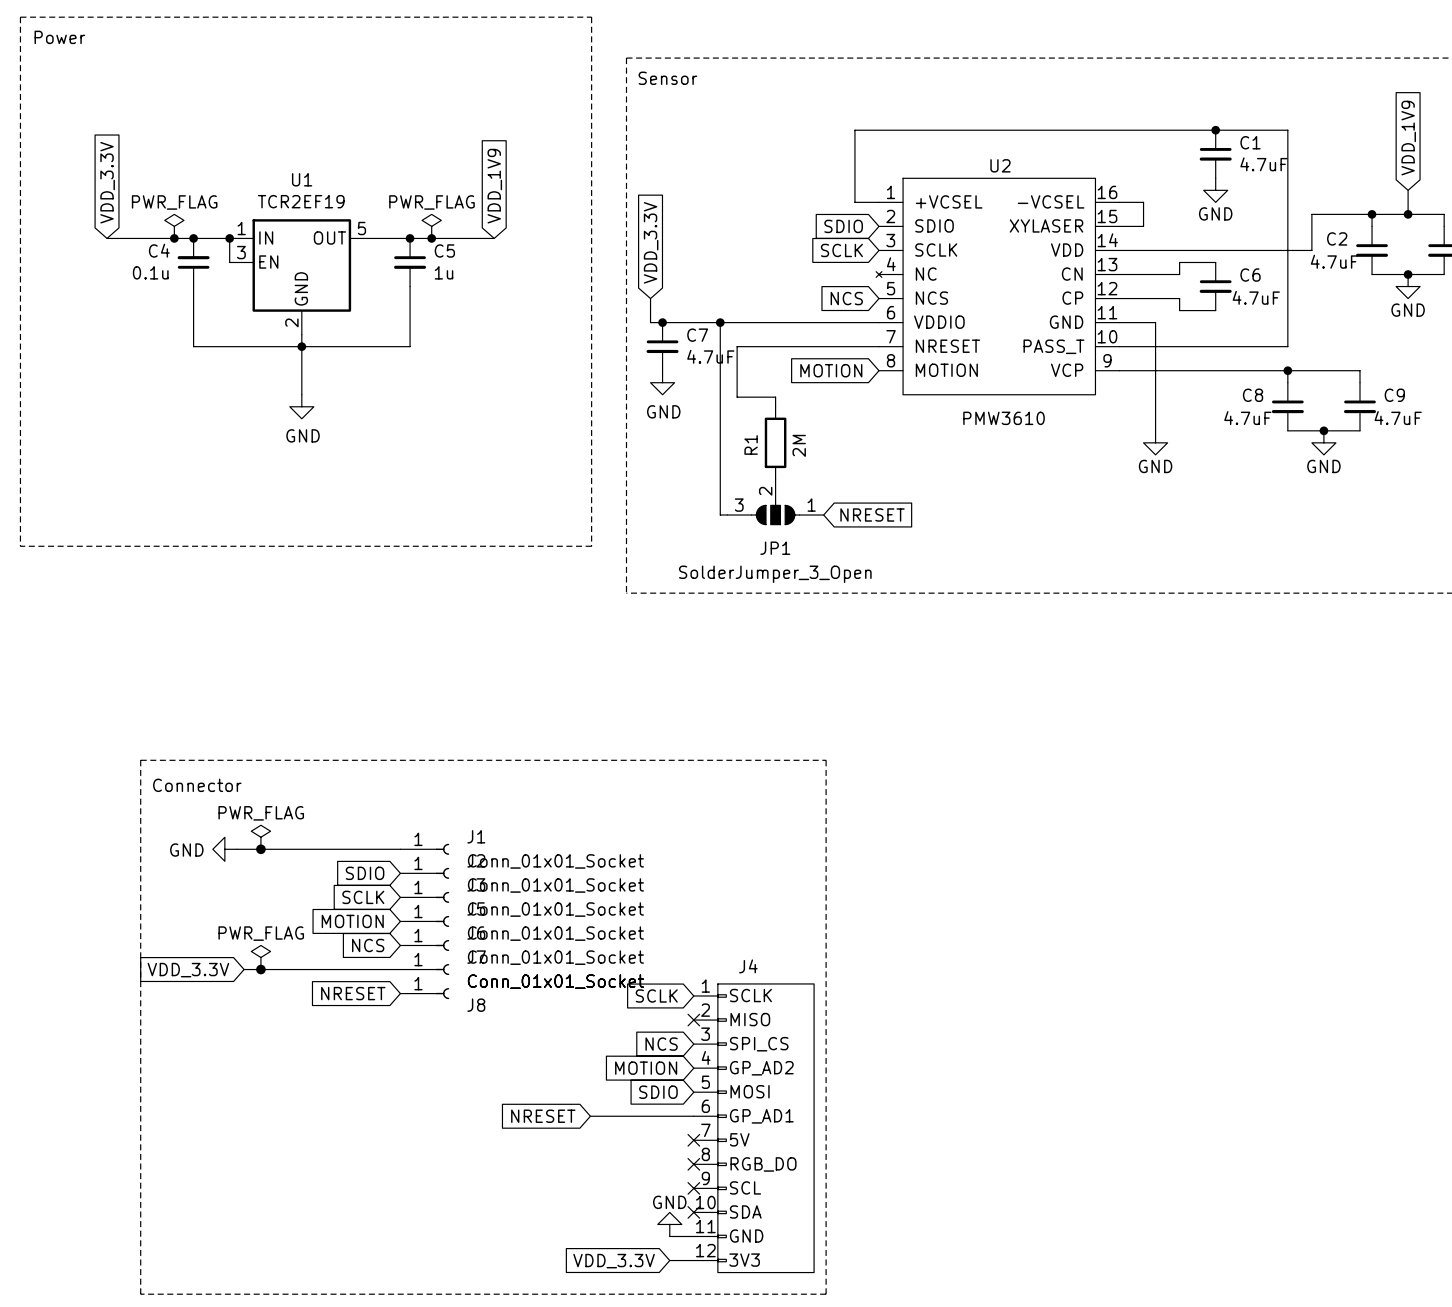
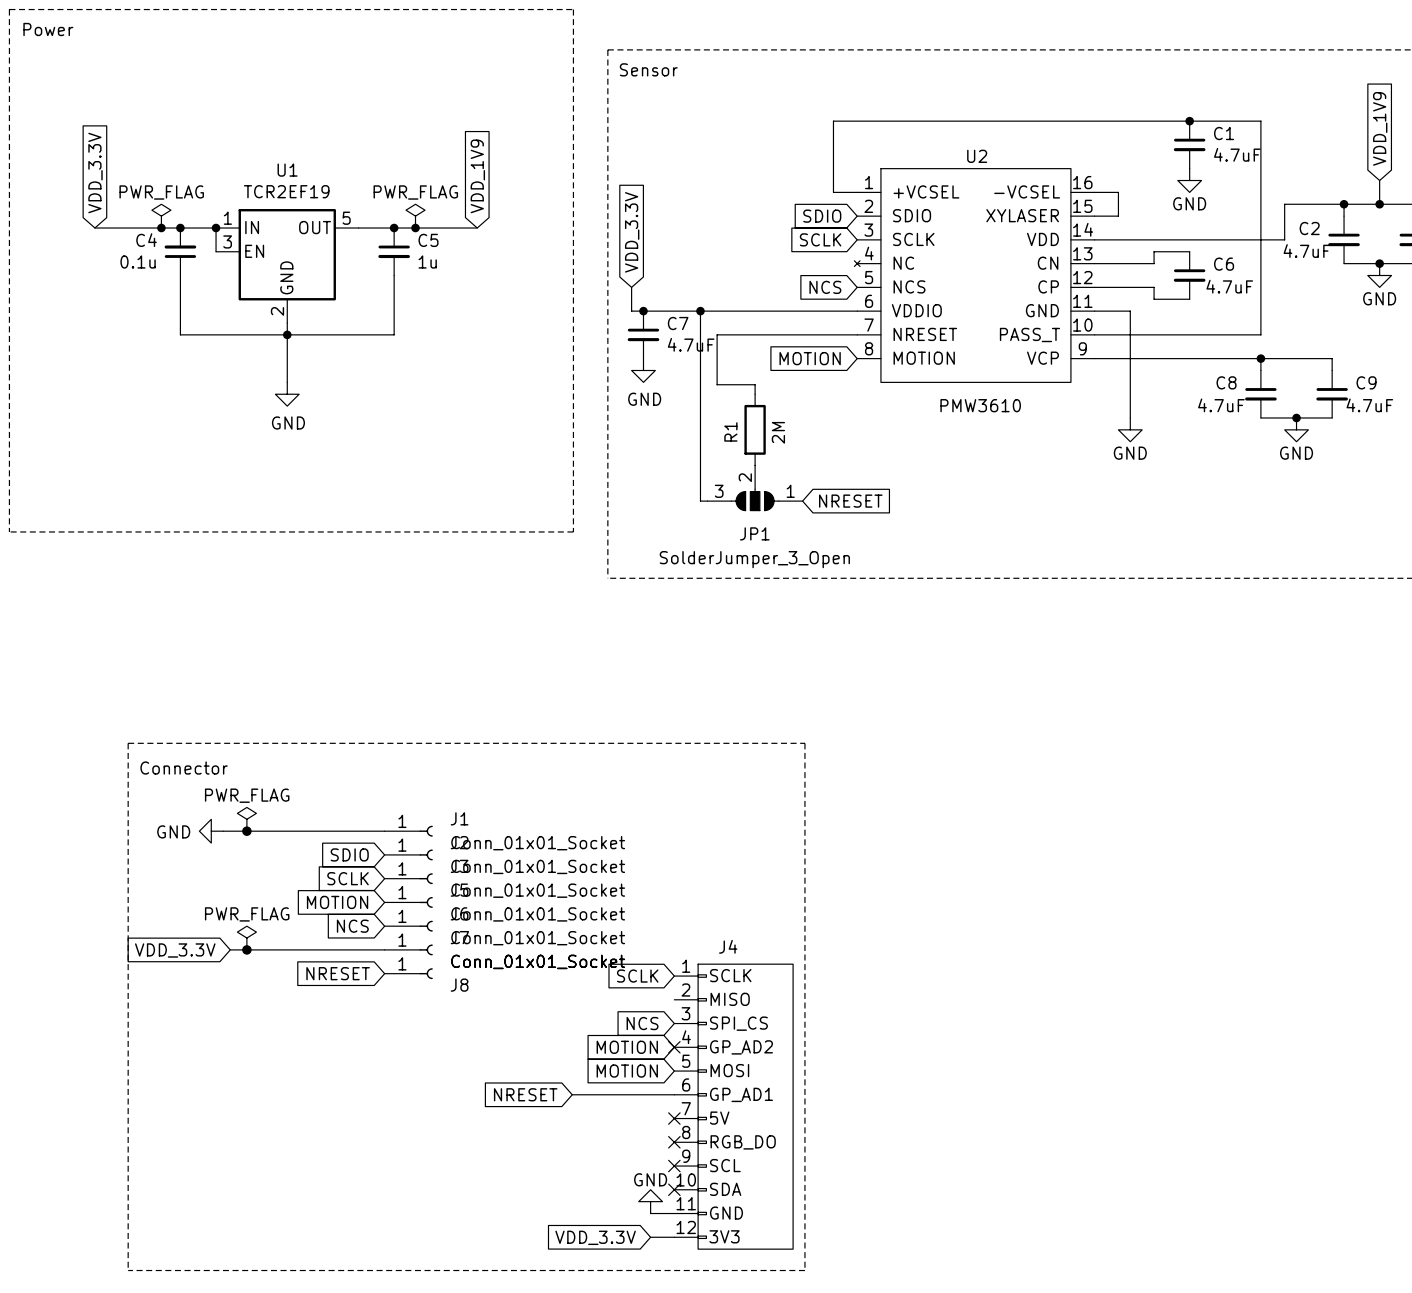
no-connect mark position: (693, 1020) -> (674, 1047)
global label: SDIO (658, 1092) -> MOTION (627, 1071)

